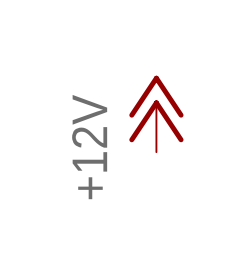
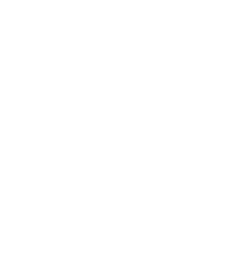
power symbol: +12V (156, 113) -> none

